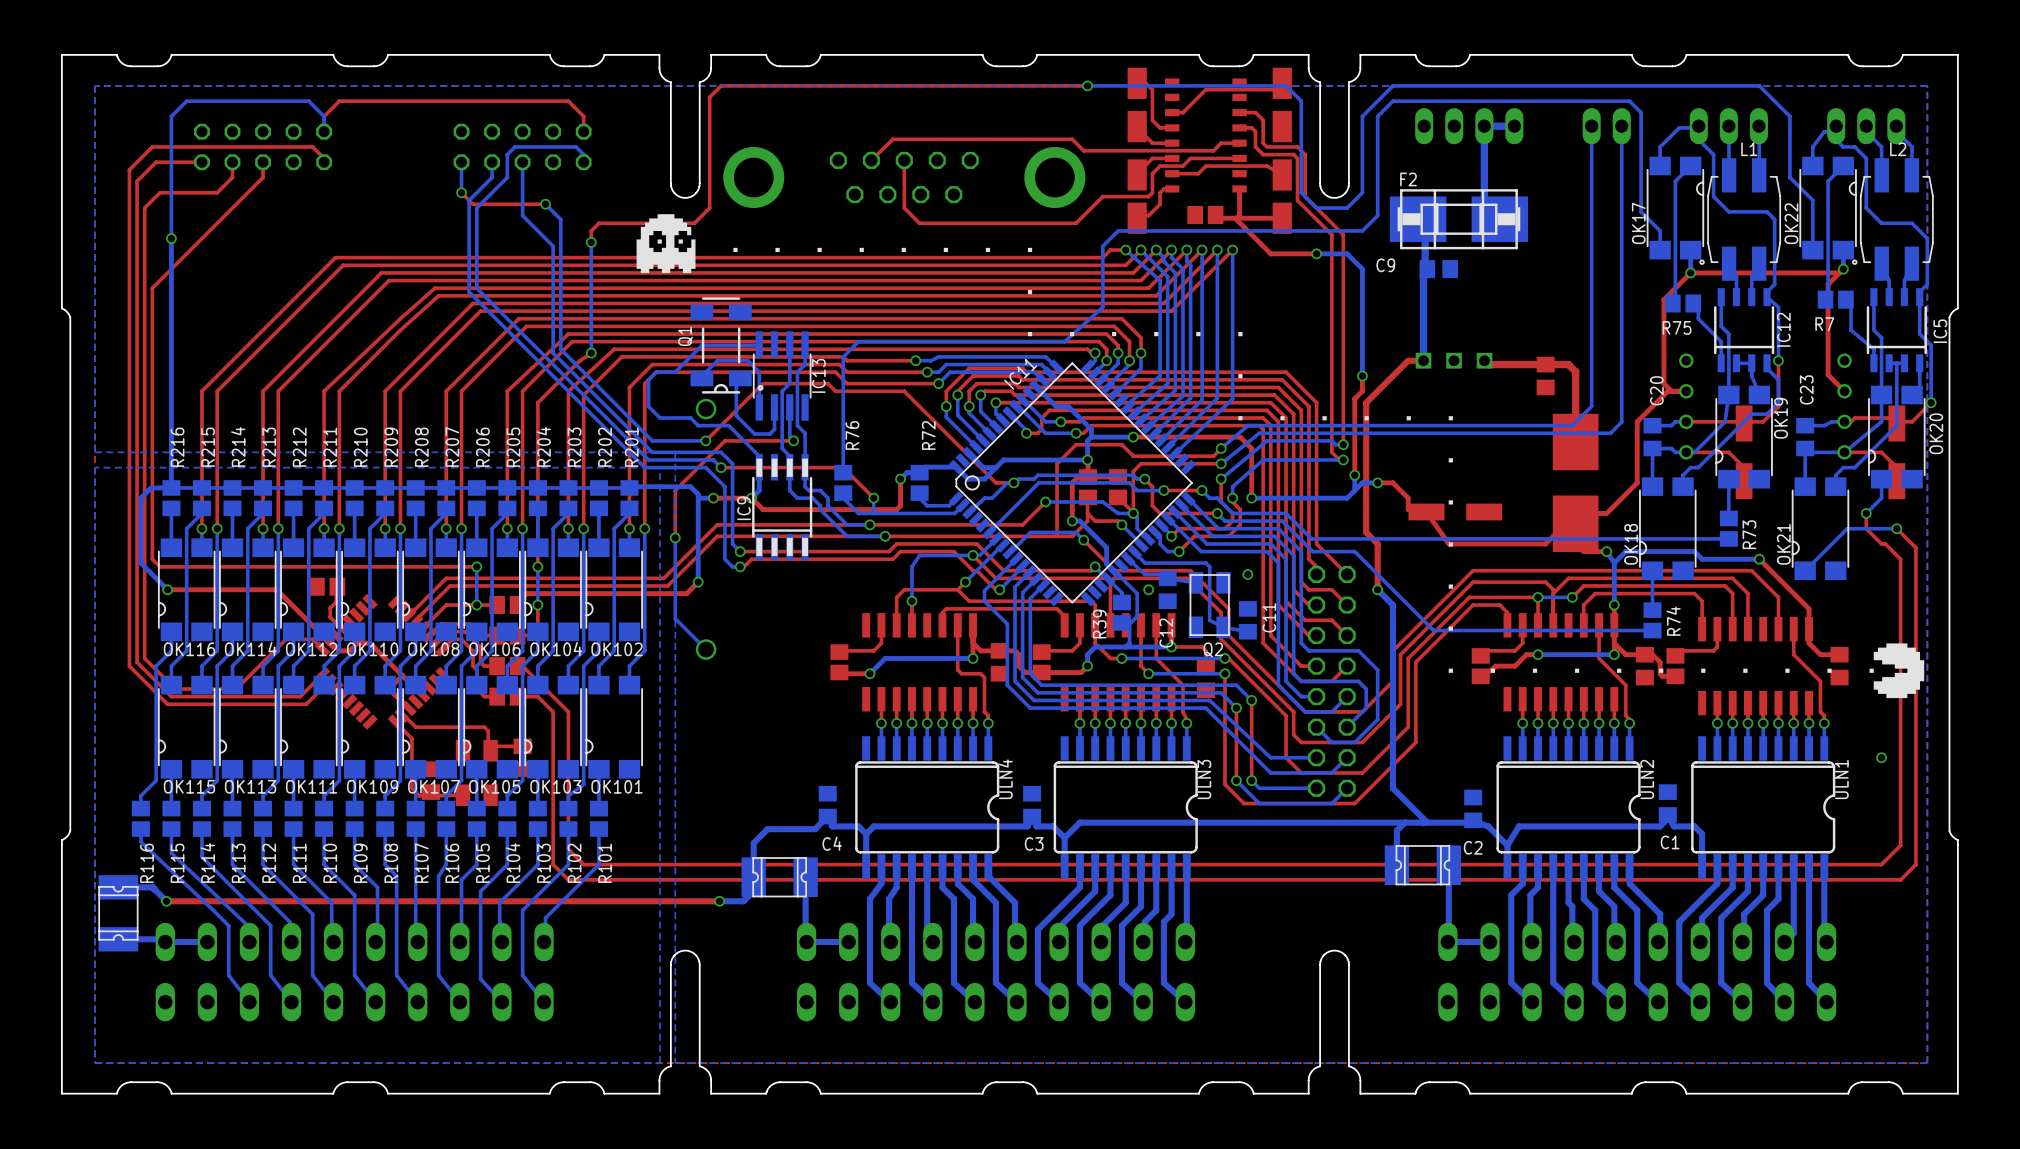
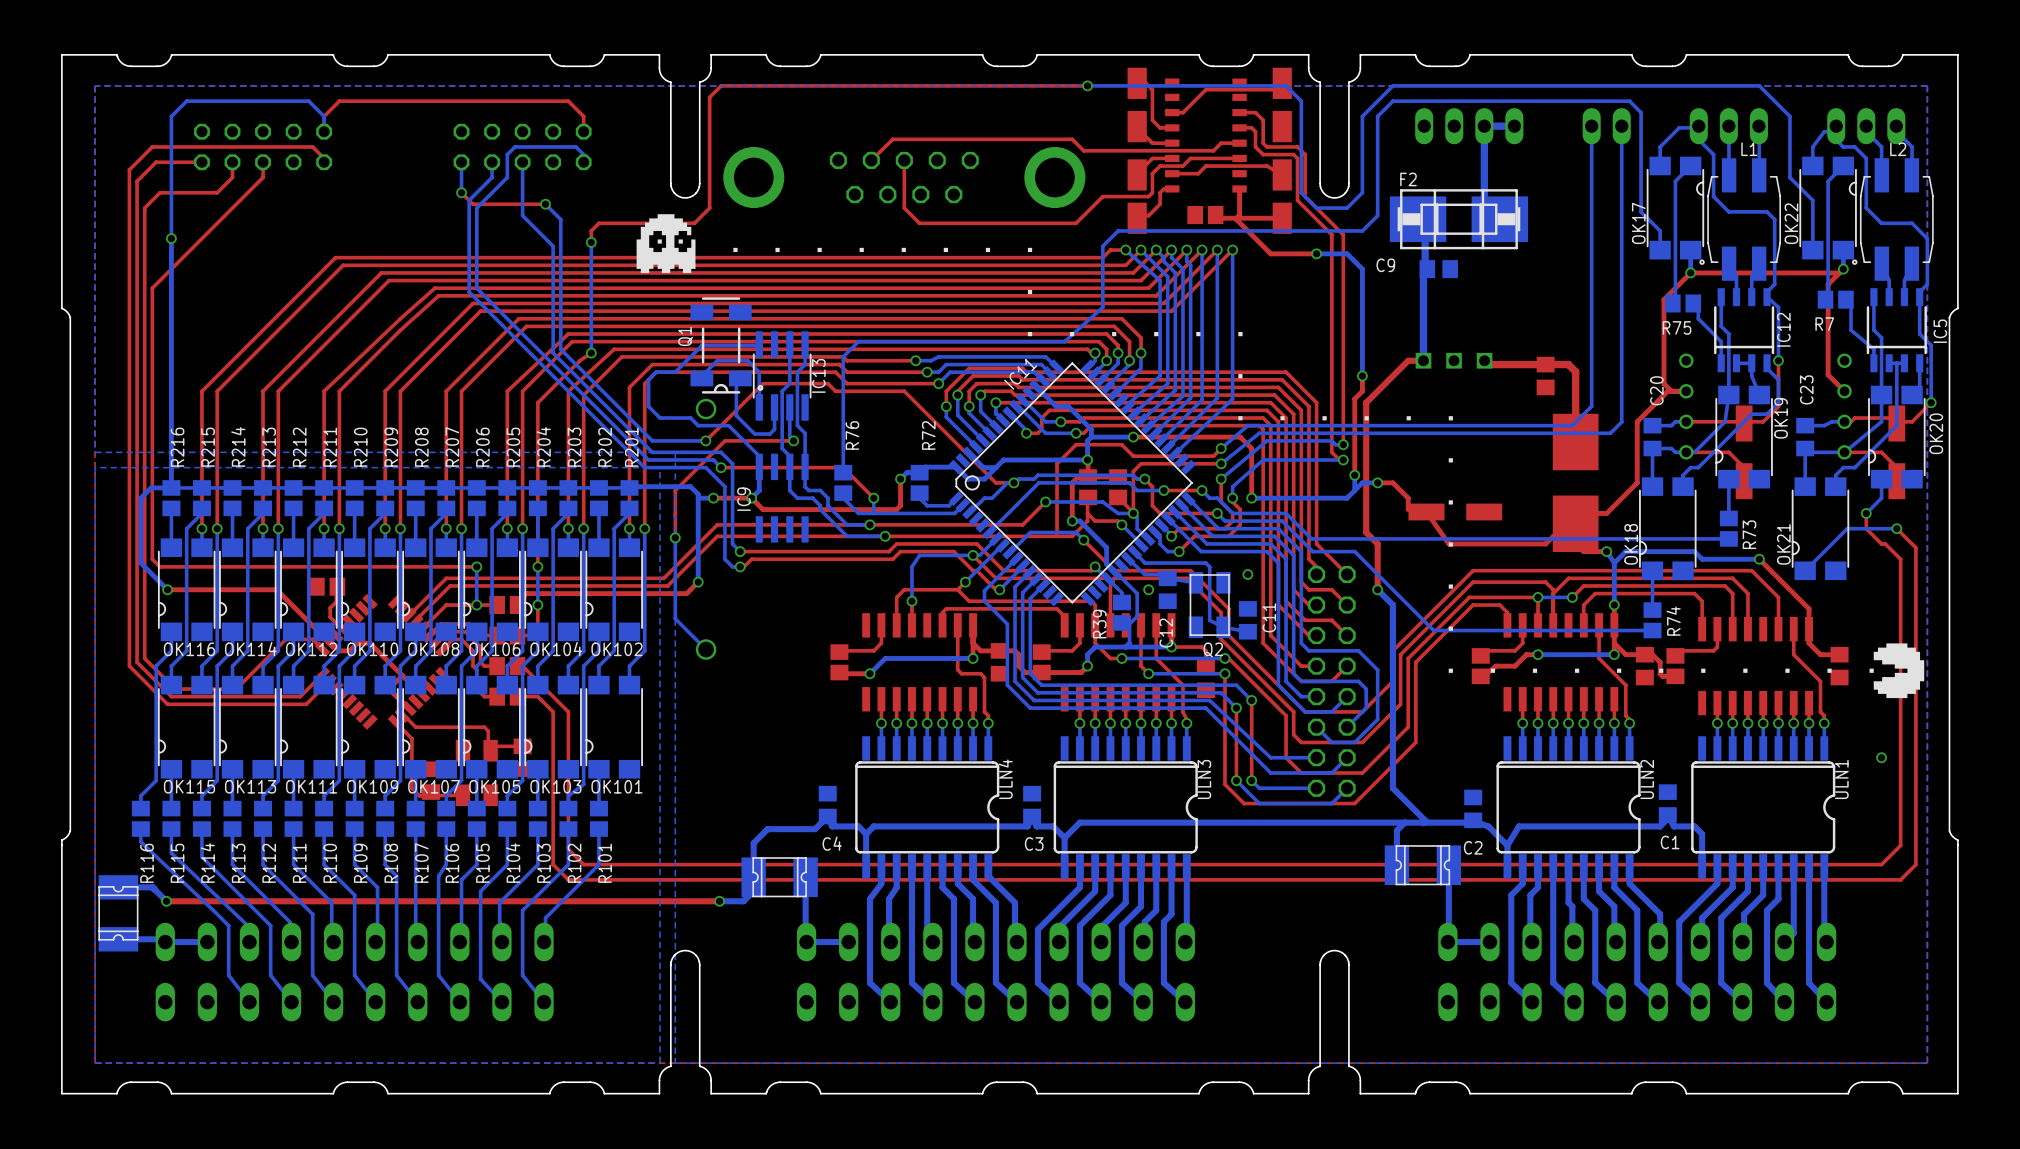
IC9 footprint: [752, 454, 813, 561] -> [755, 453, 809, 543]

